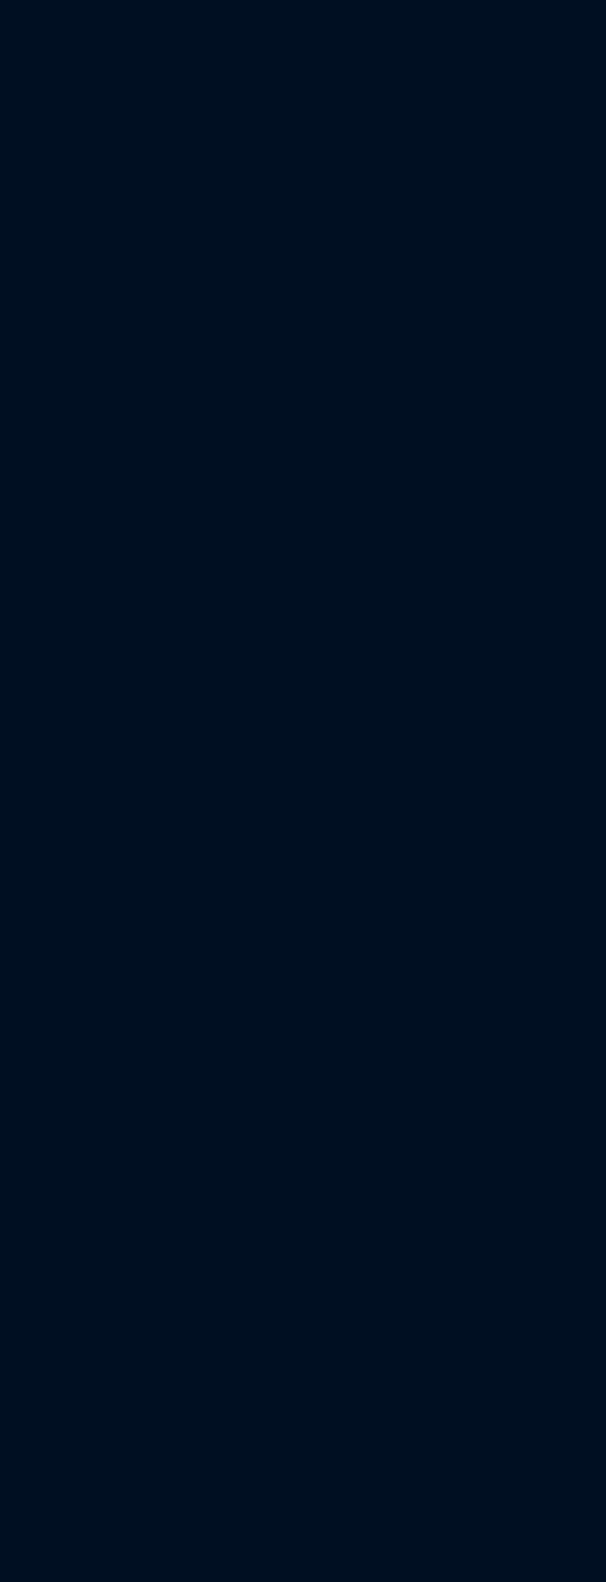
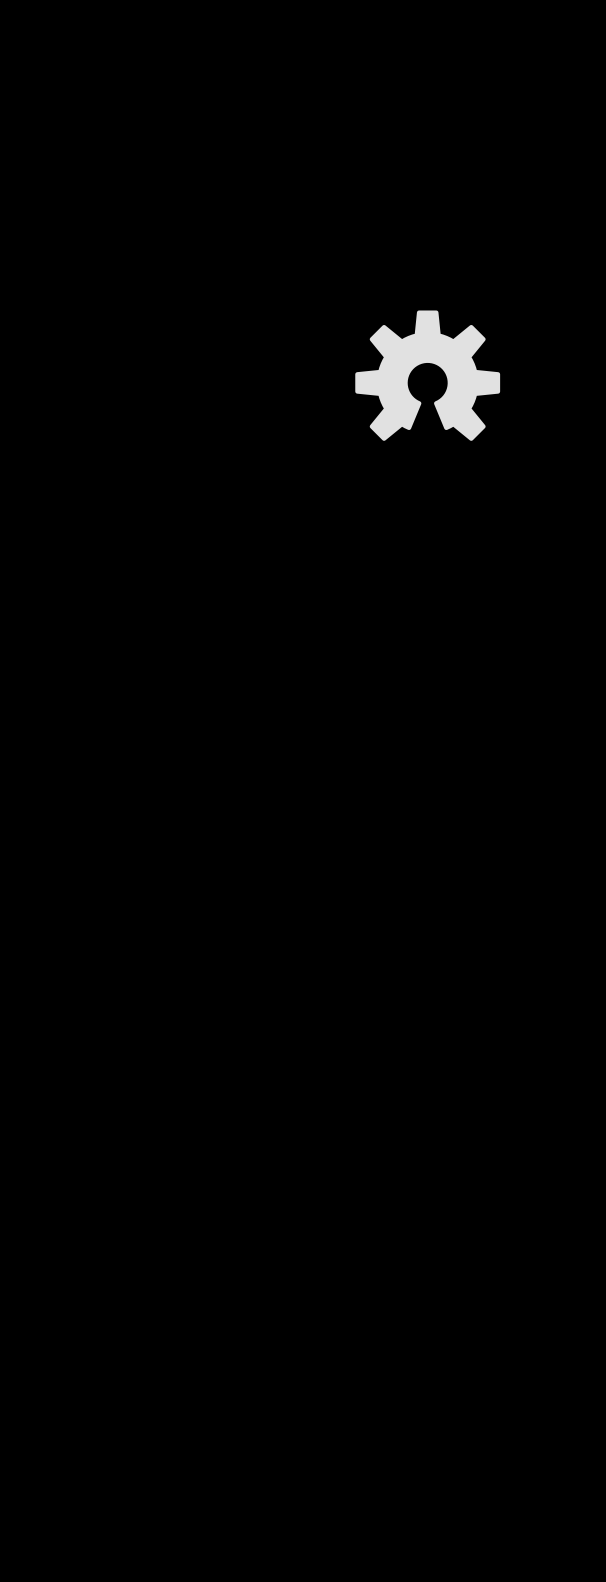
drawing: none -> [355, 310, 501, 441]

